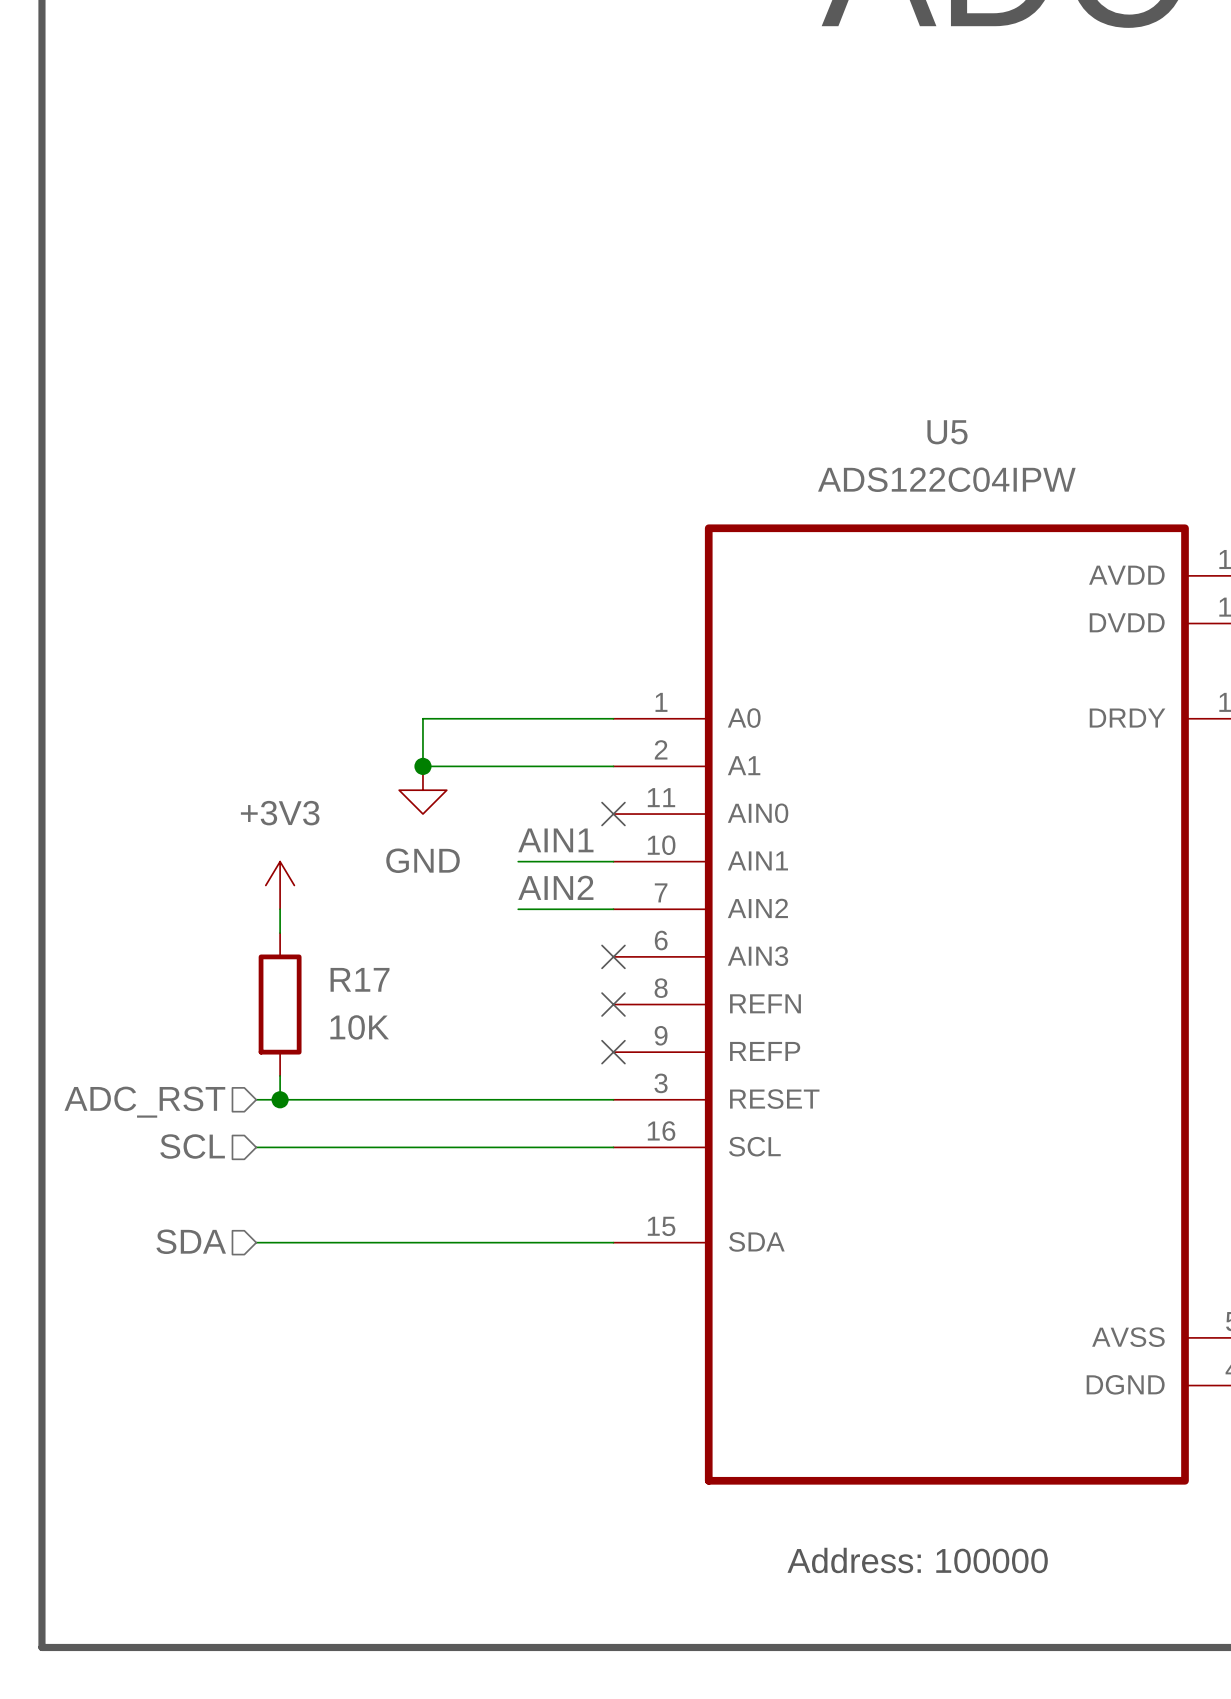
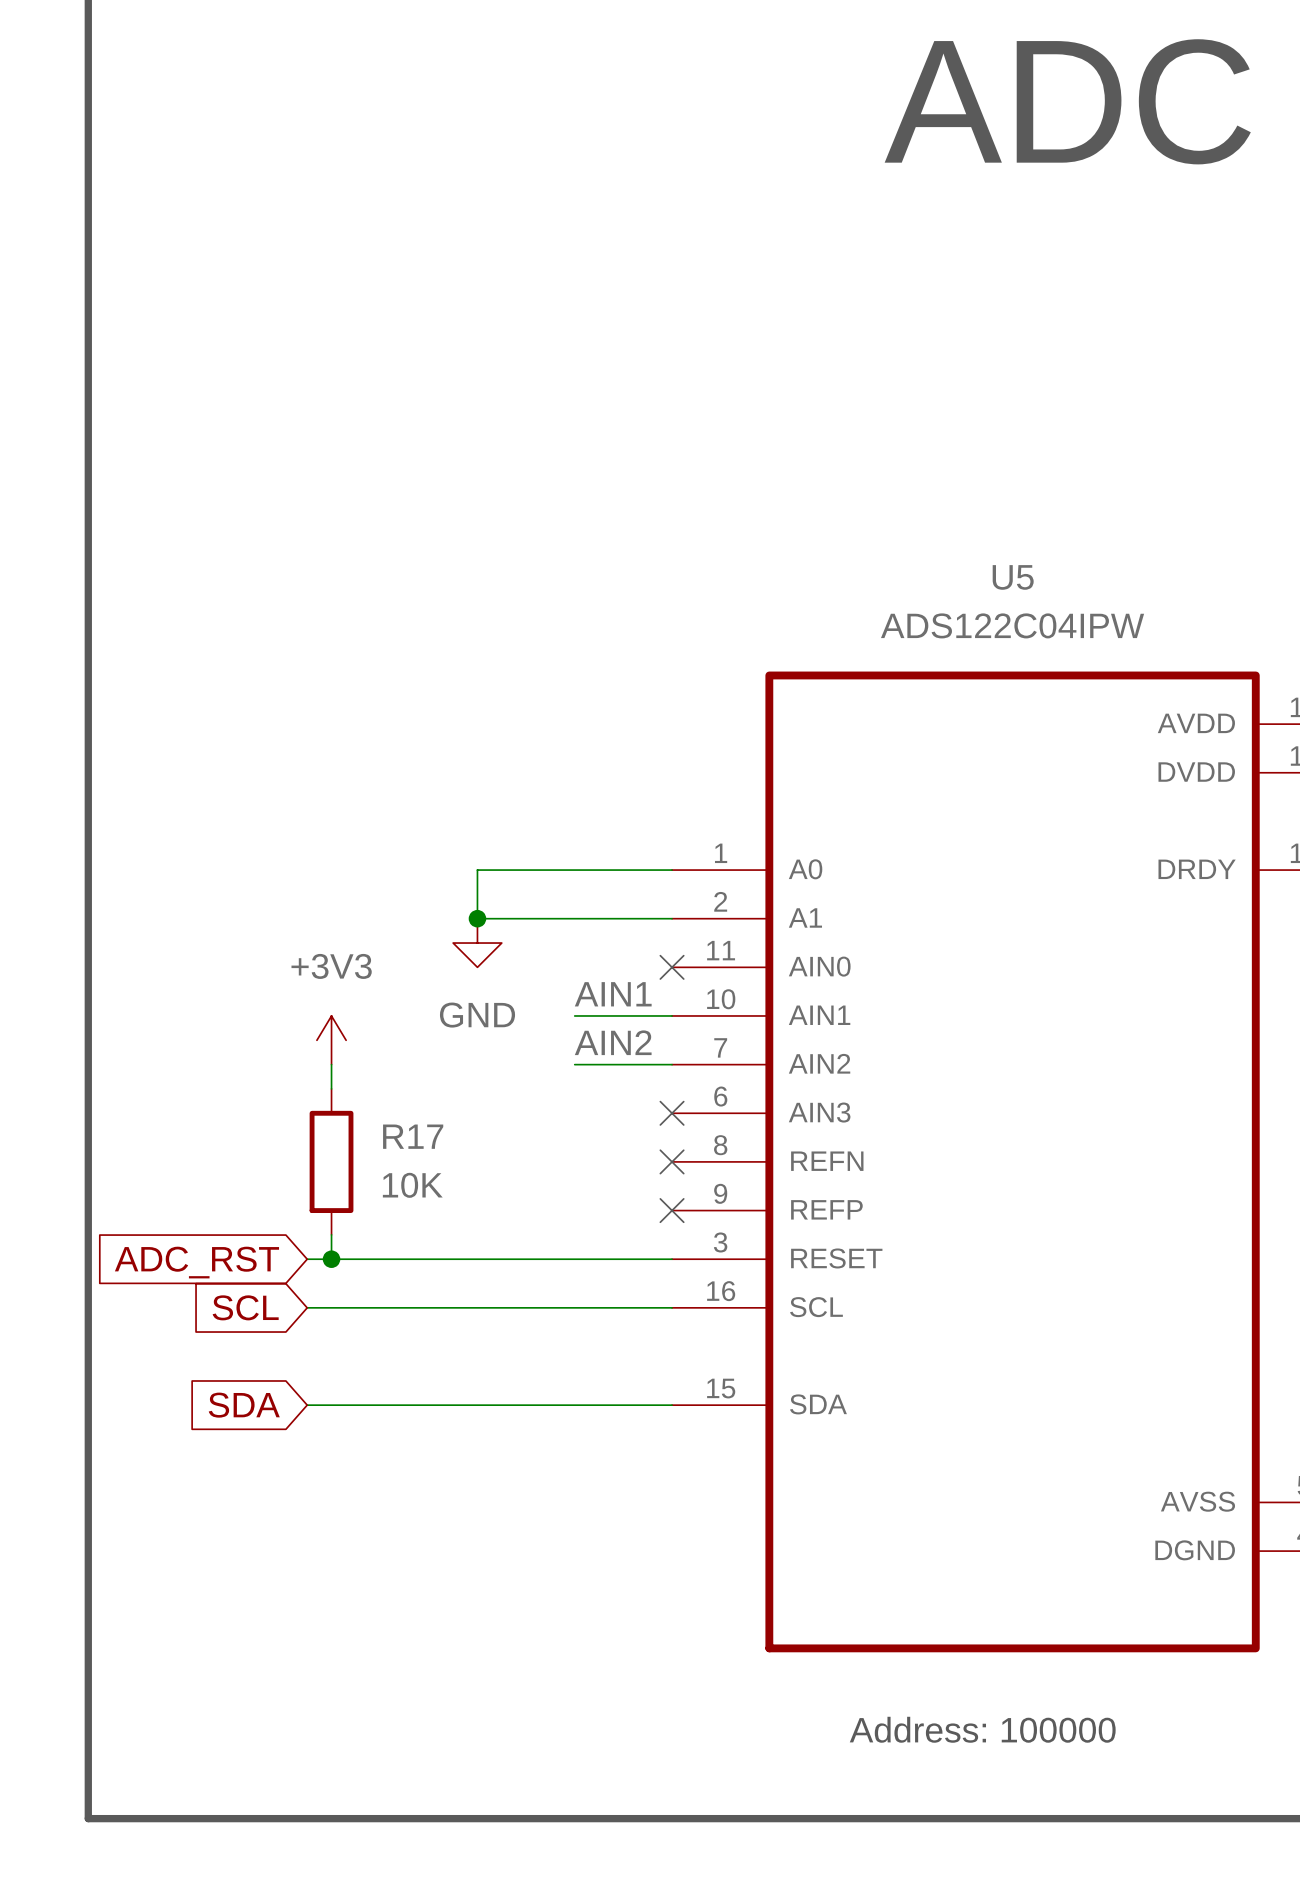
hierarchical label: ADC_RST (144, 1102) -> none
global label: none -> ADC_RST (196, 1262)
hierarchical label: SCL (192, 1146) -> none
global label: none -> SCL (245, 1307)
hierarchical label: SDA (191, 1241) -> none
global label: none -> SDA (244, 1405)

